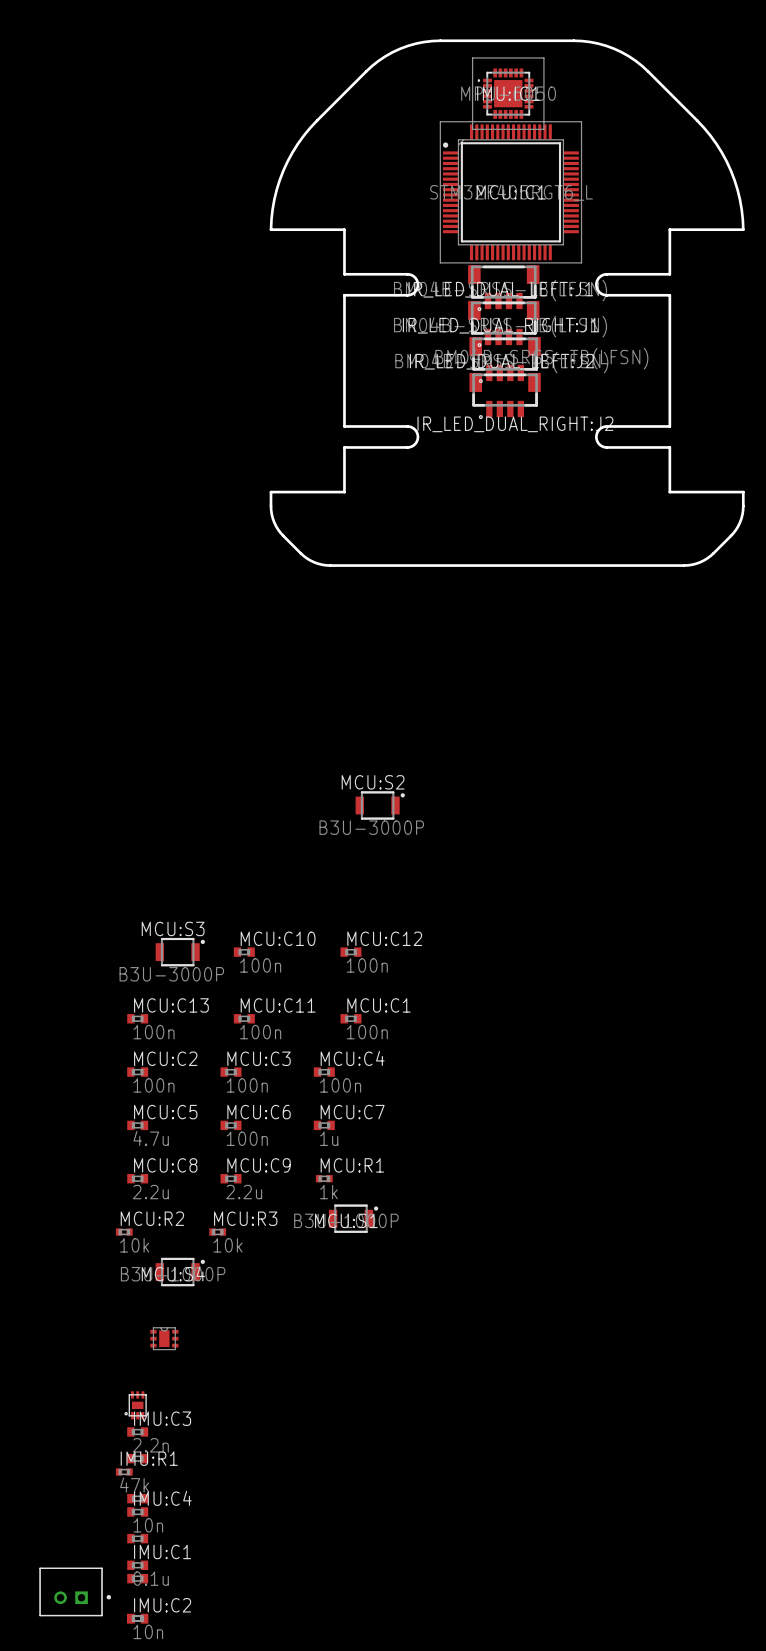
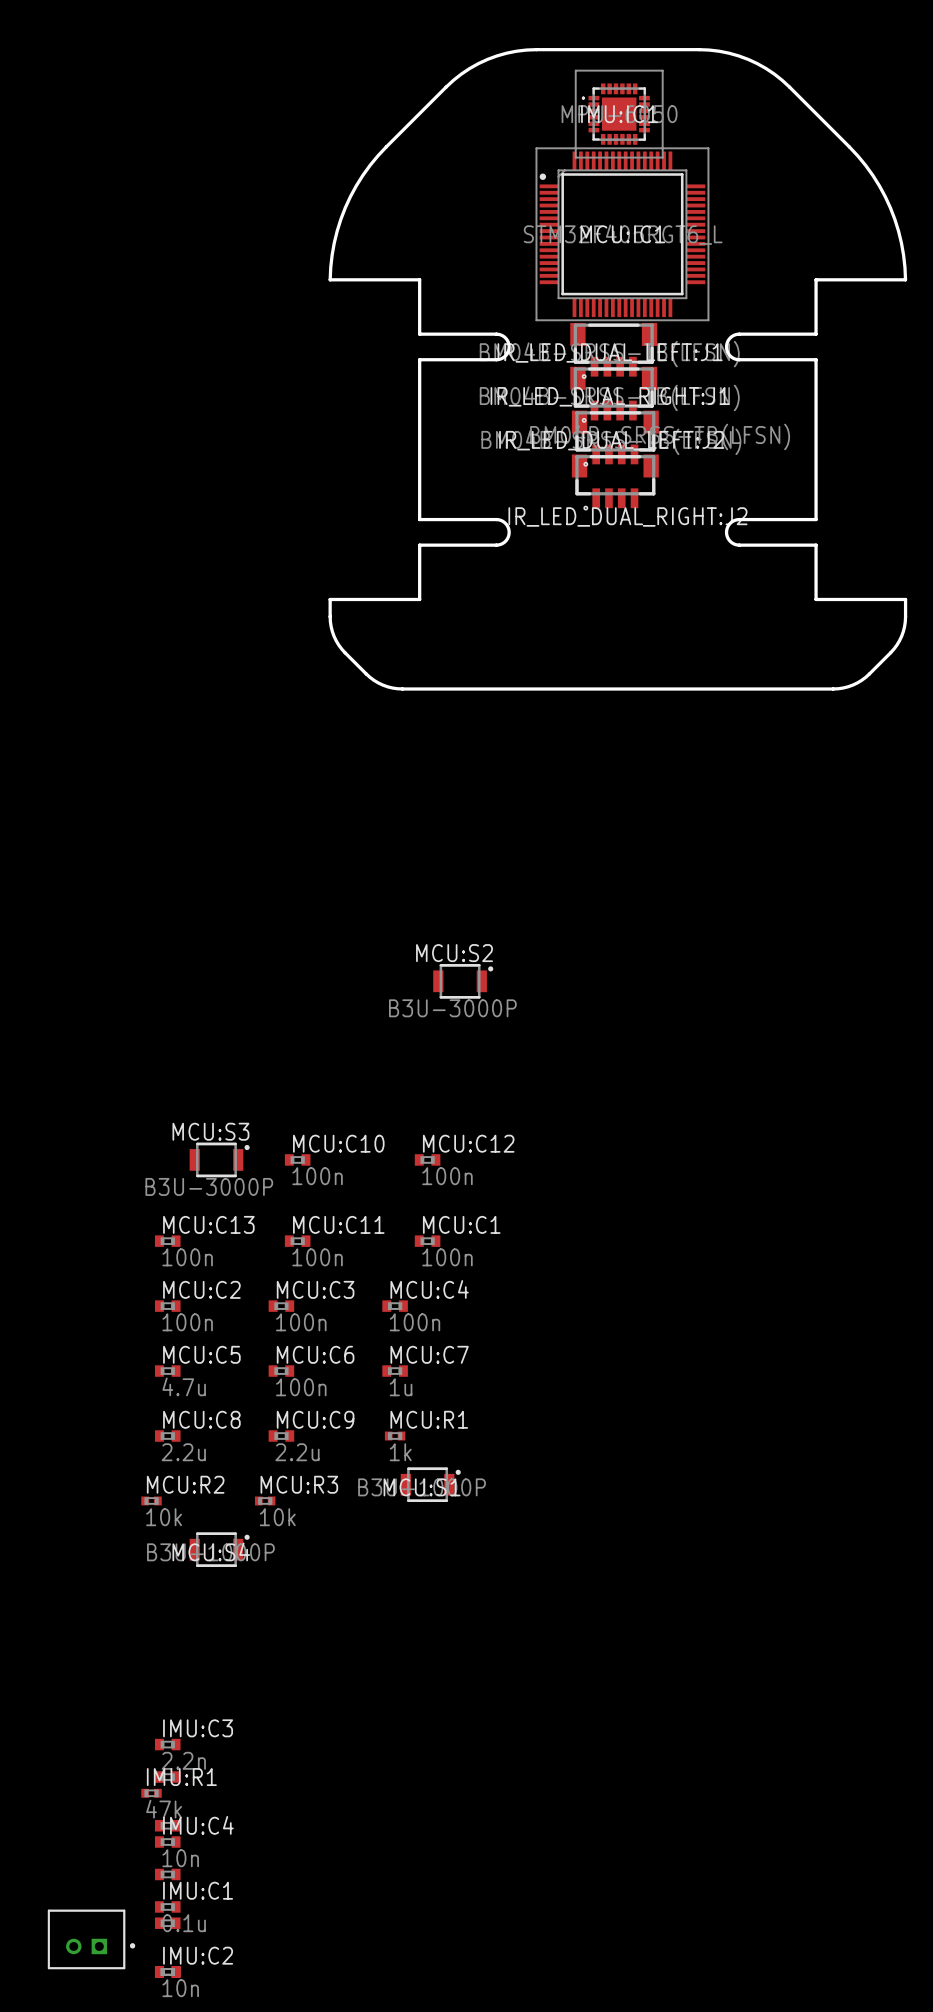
part: (164, 1338) -> none
part: (135, 1405) -> none

